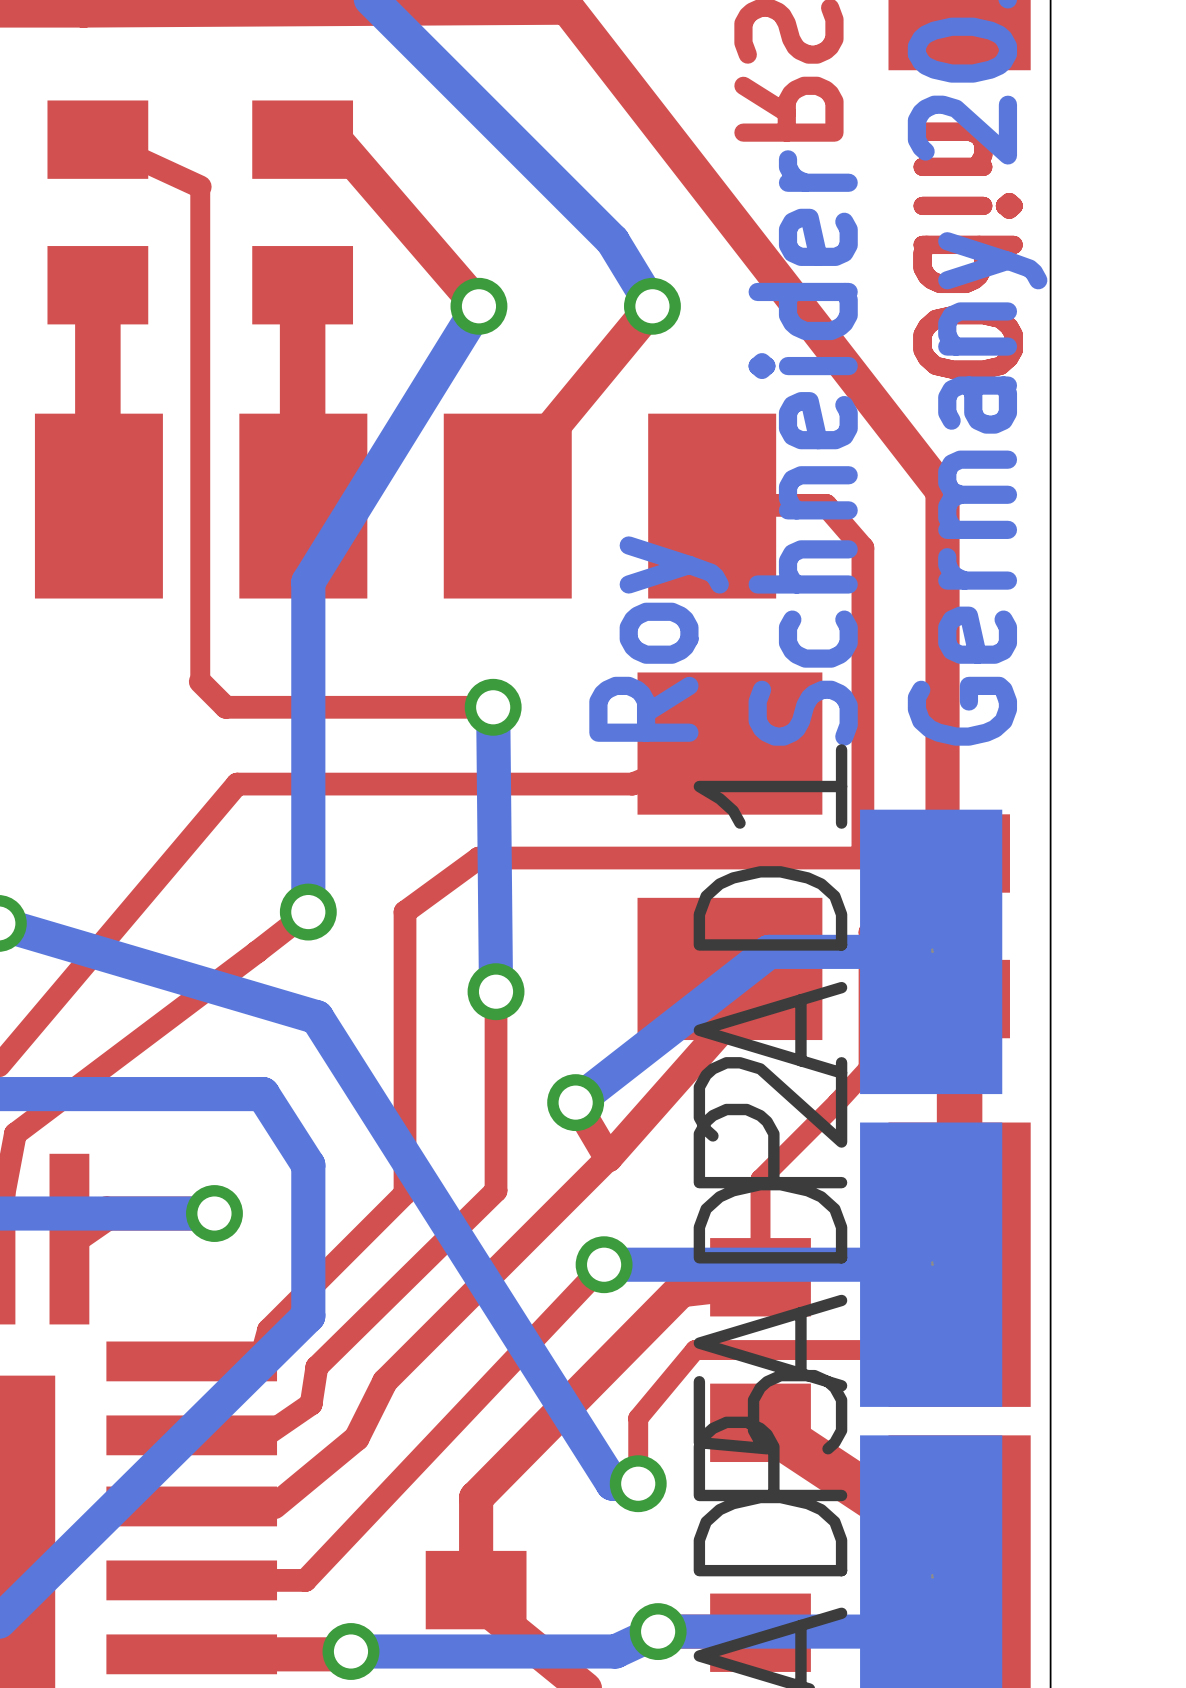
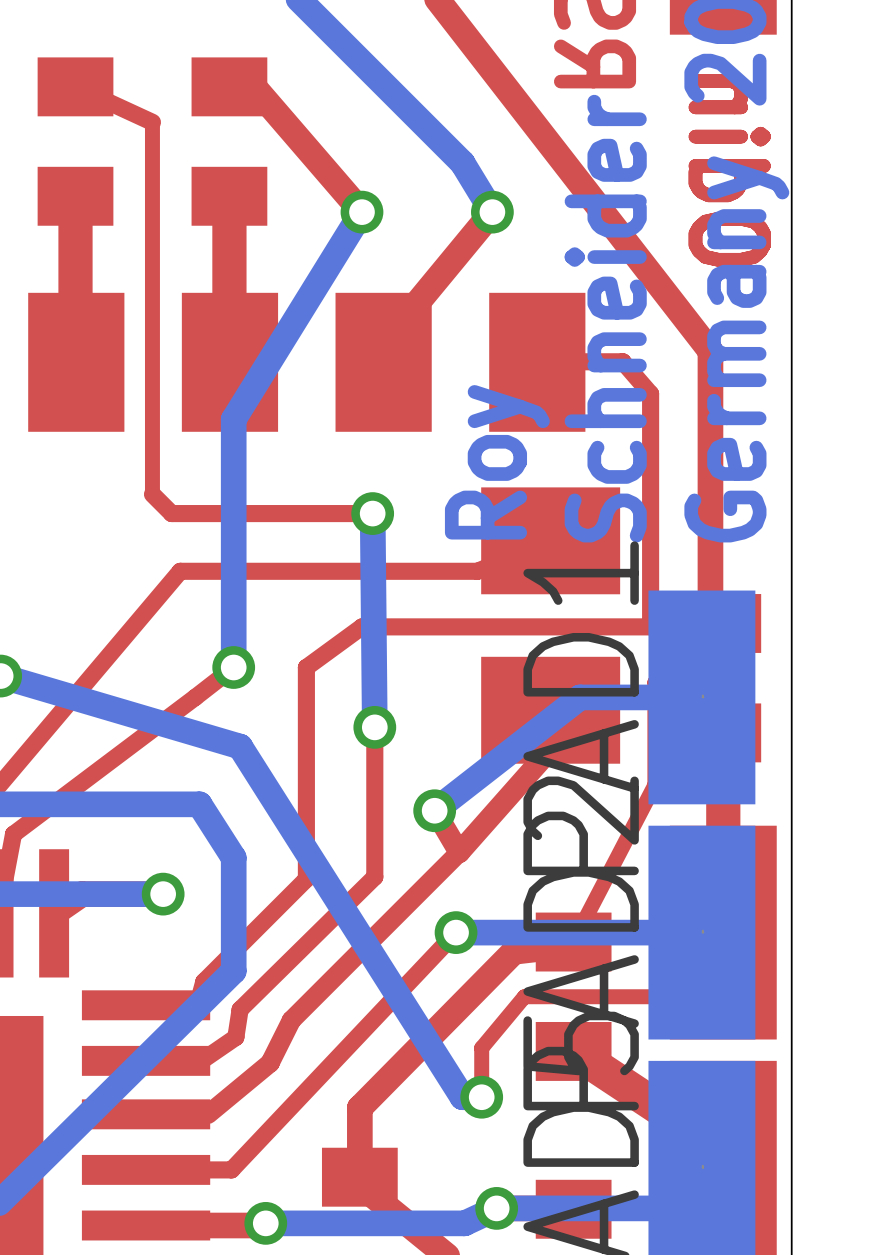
top track: (868, 1068) (760, 1179) (760, 1277) -> (654, 785) (573, 941)

